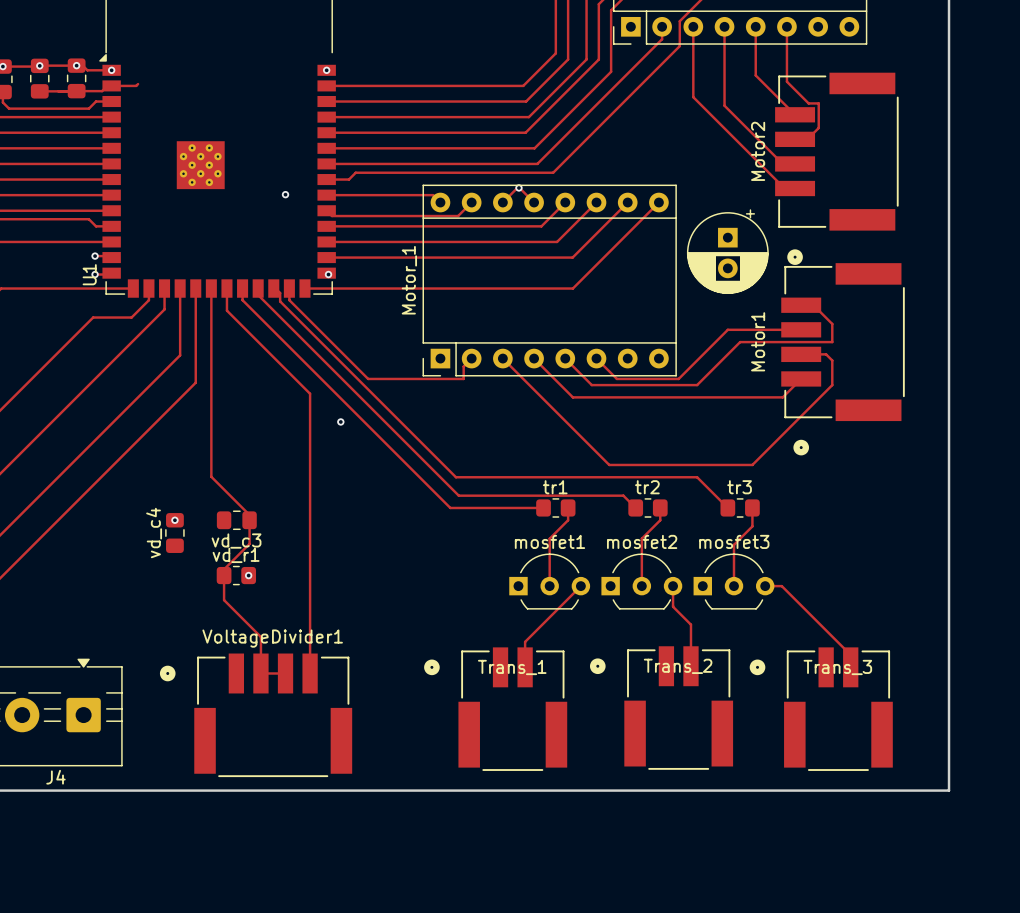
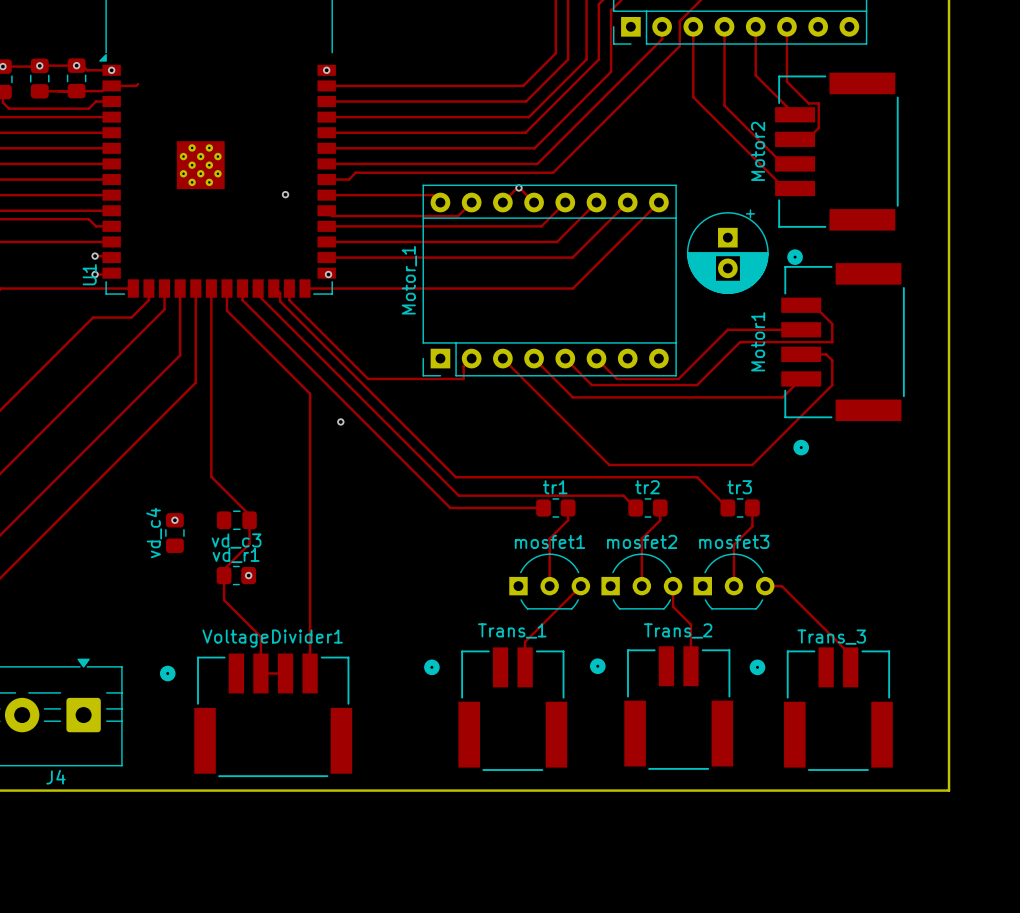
Trans_2 name position: Trans_2 (678, 666) -> Trans_2 (678, 630)
Trans_1 name position: Trans_1 (512, 667) -> Trans_1 (512, 630)
Trans_3 name position: Trans_3 (837, 667) -> Trans_3 (831, 637)

